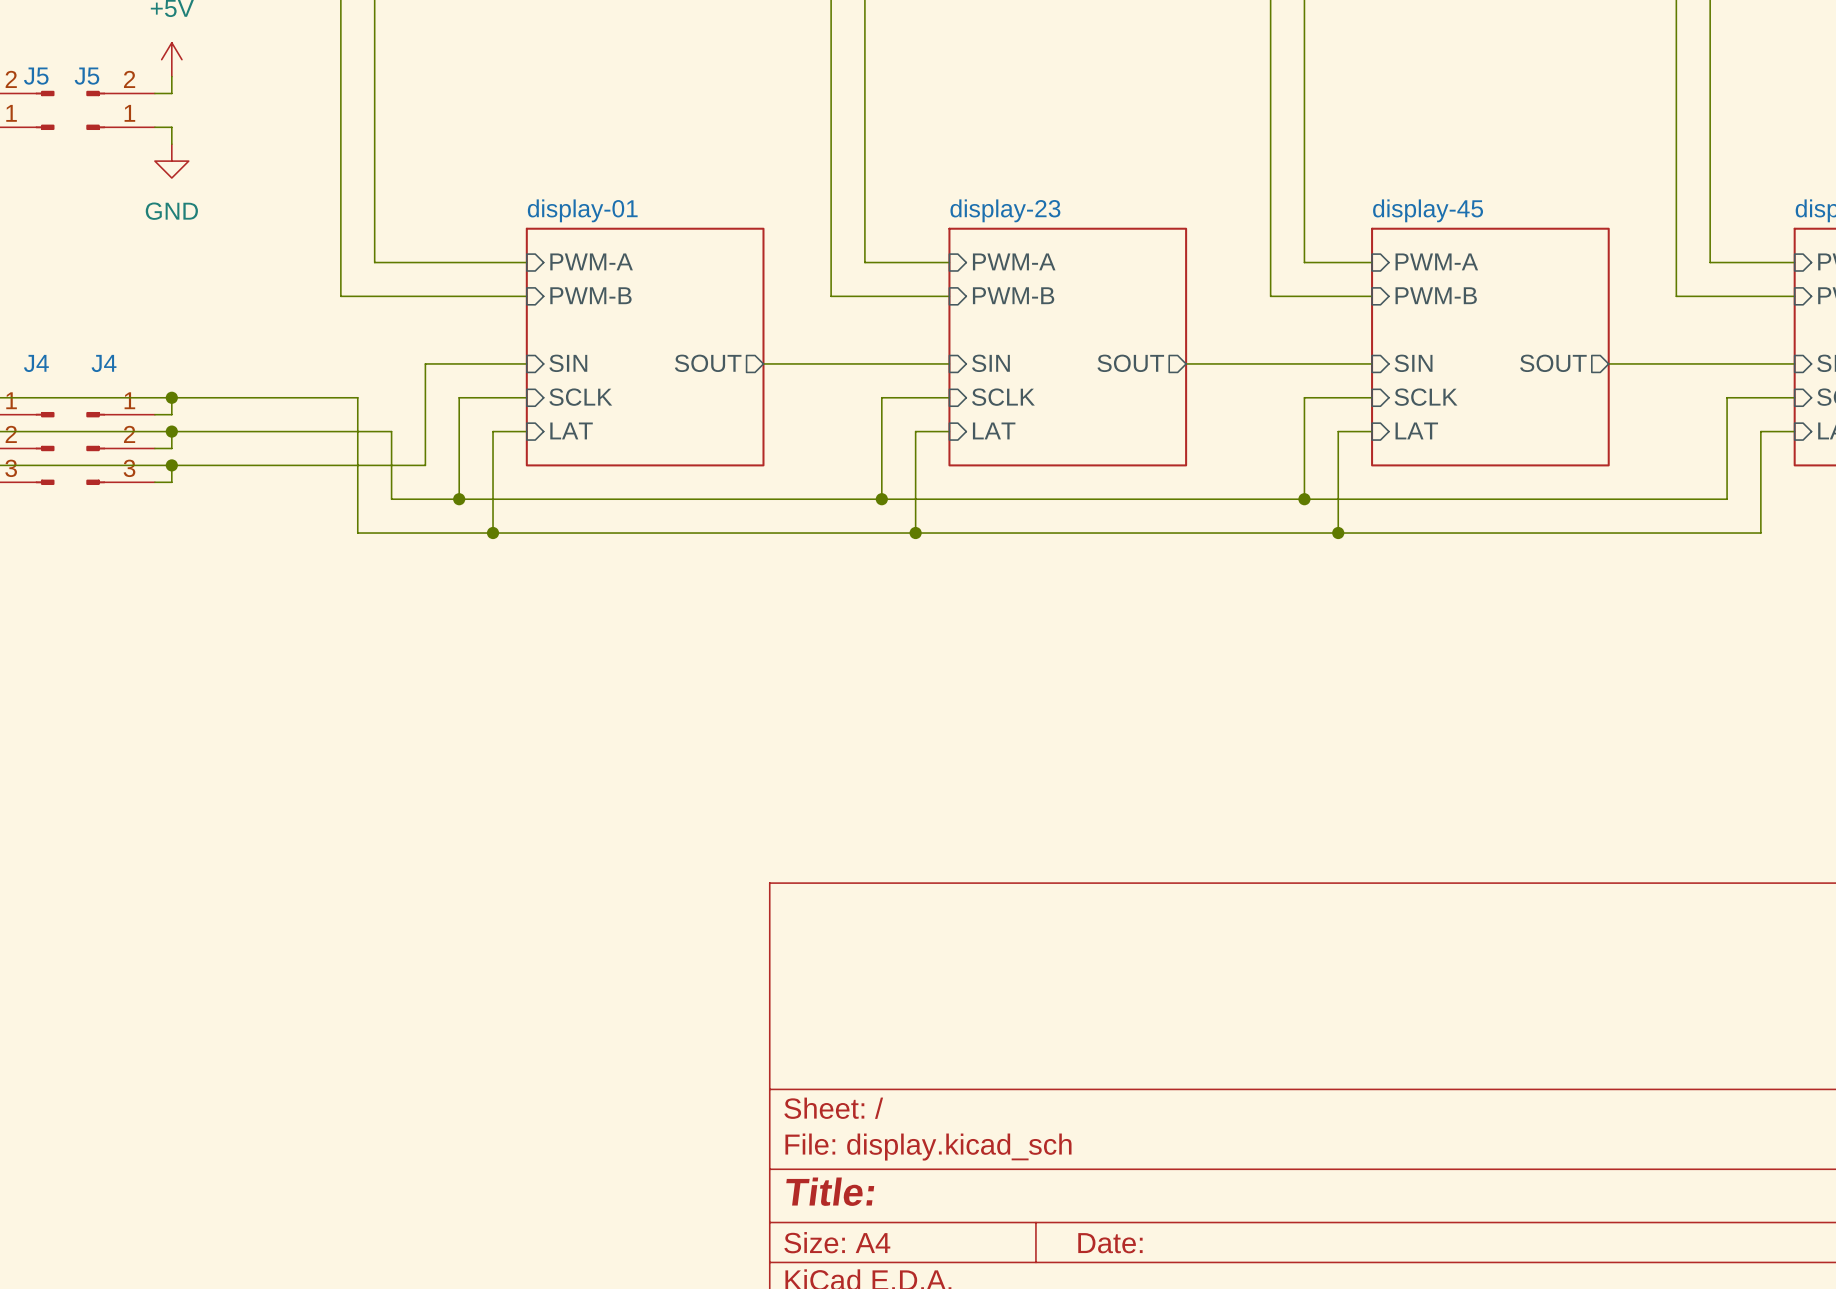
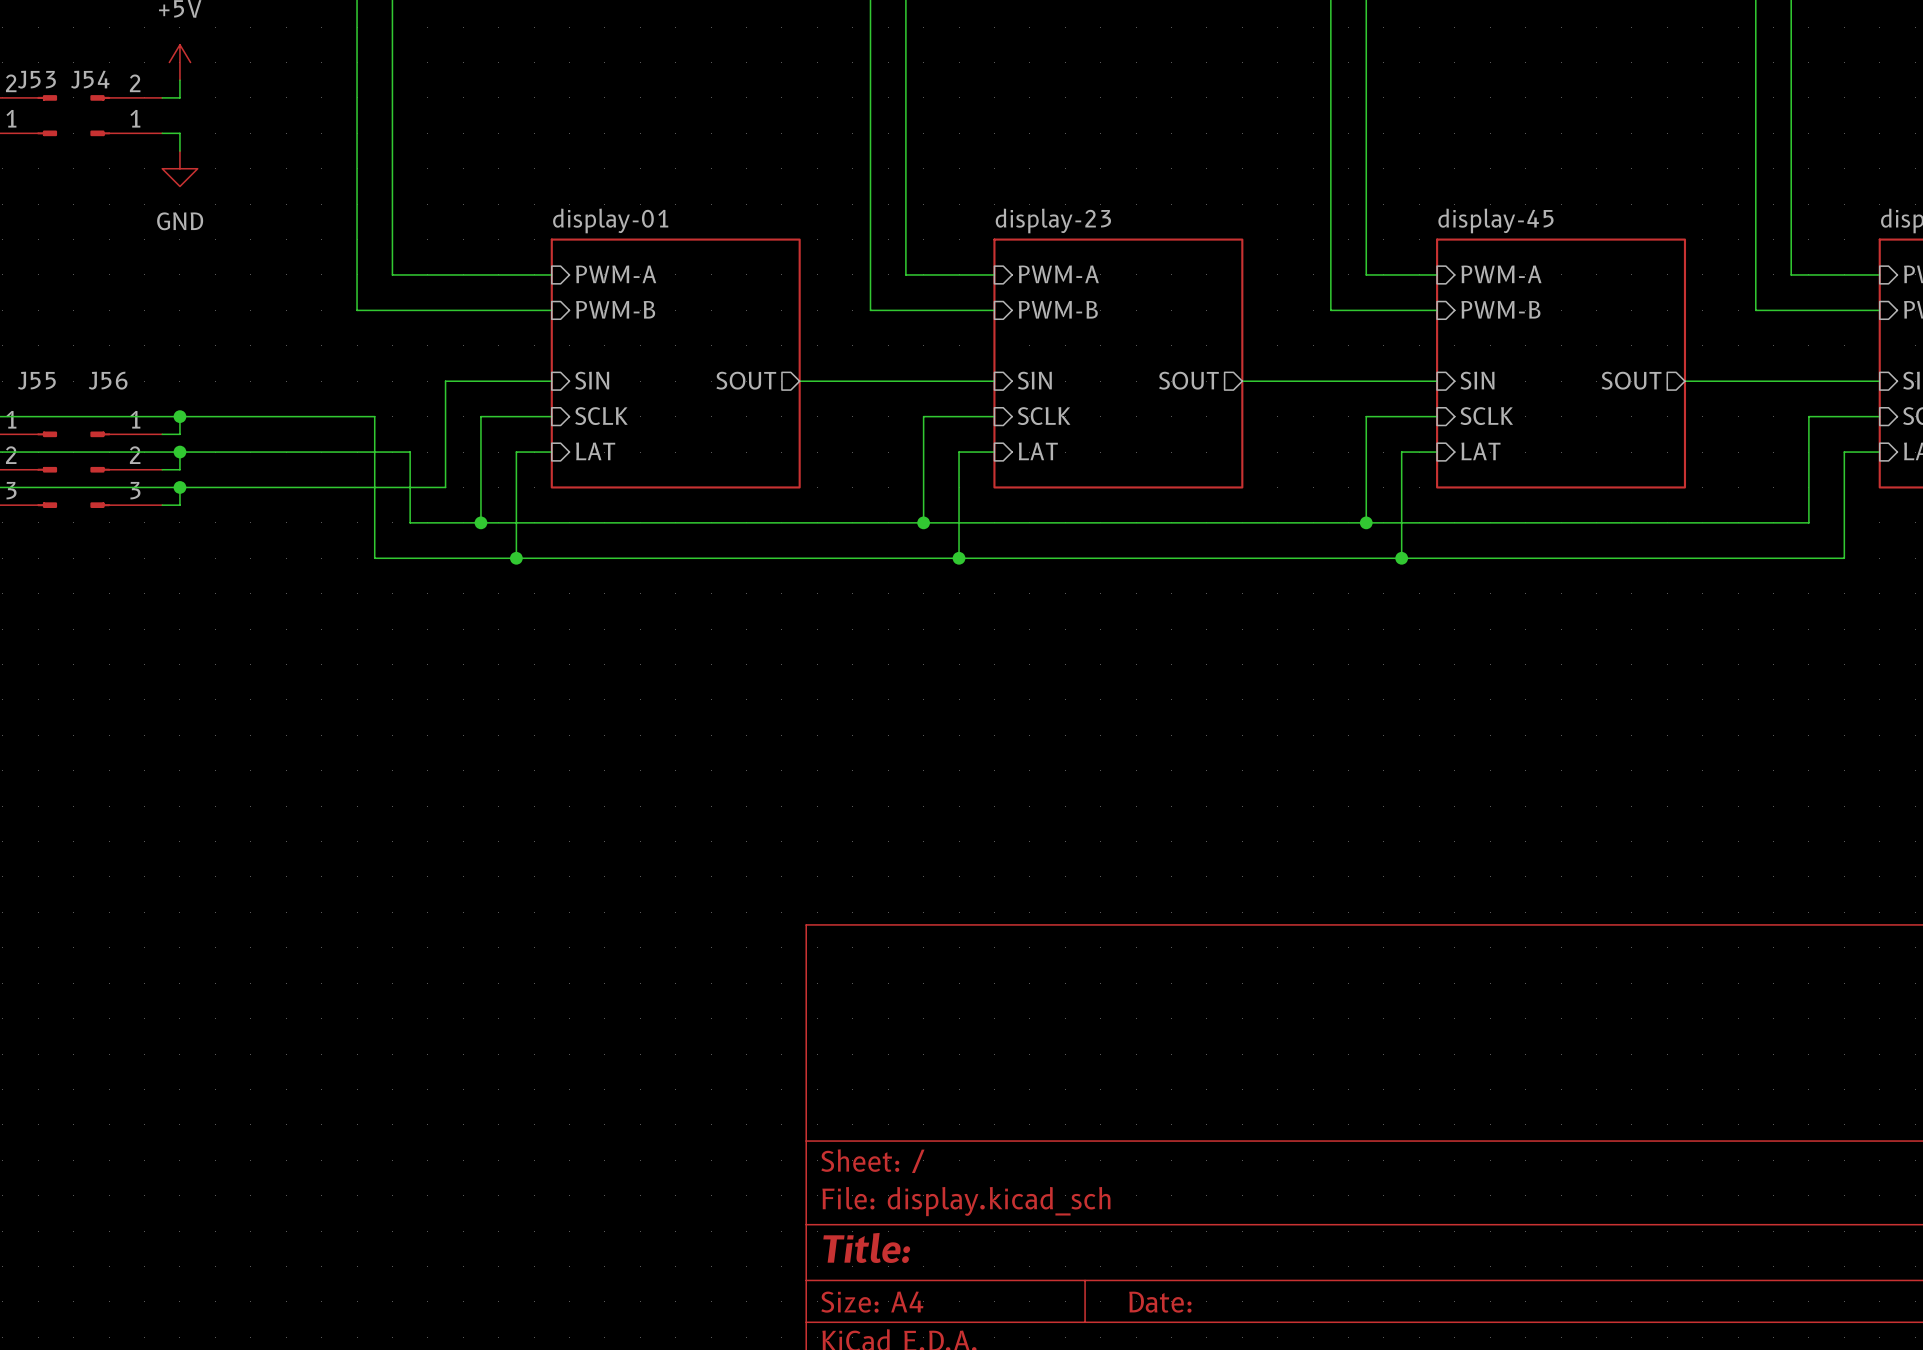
J5 name: J5 (36, 76) -> J53 (36, 79)
J5 name: J5 (86, 76) -> J54 (90, 79)
J4 name: J4 (36, 363) -> J55 (36, 380)
J4 name: J4 (104, 363) -> J56 (108, 380)

